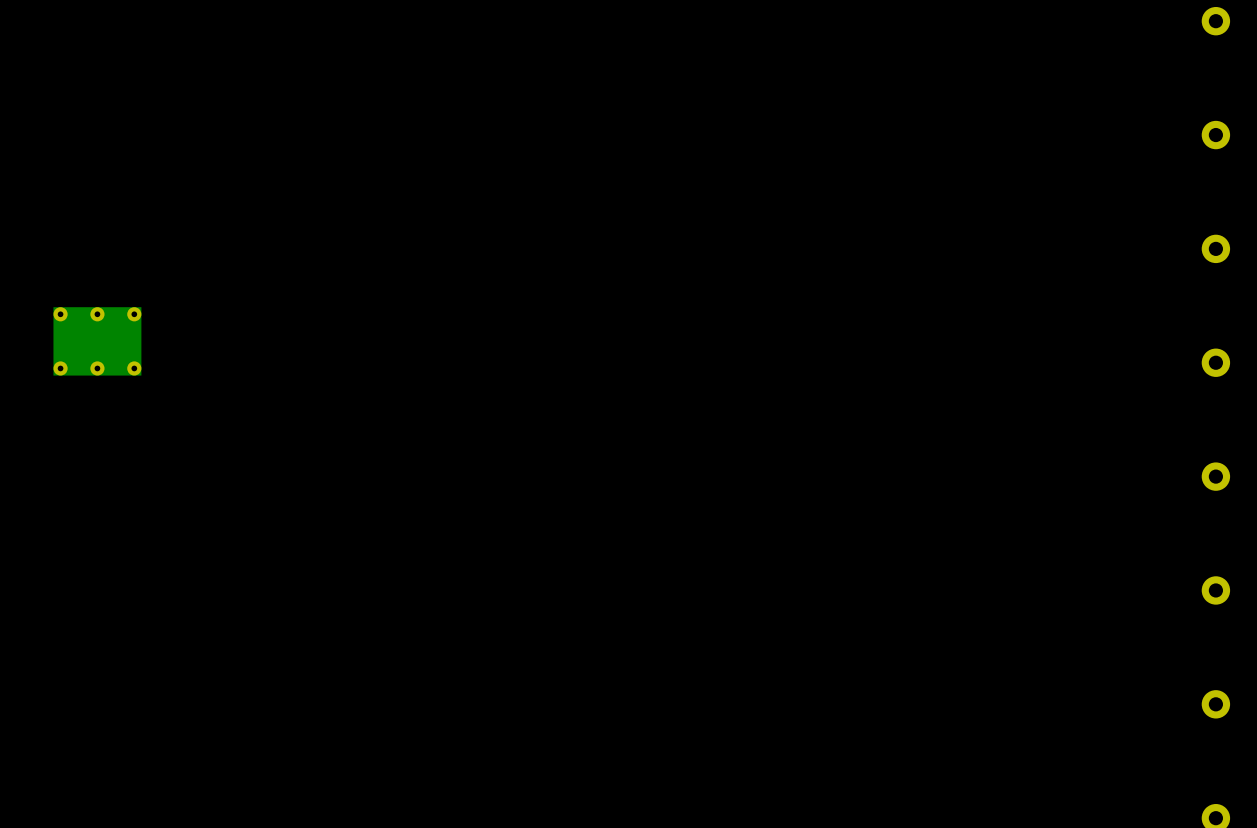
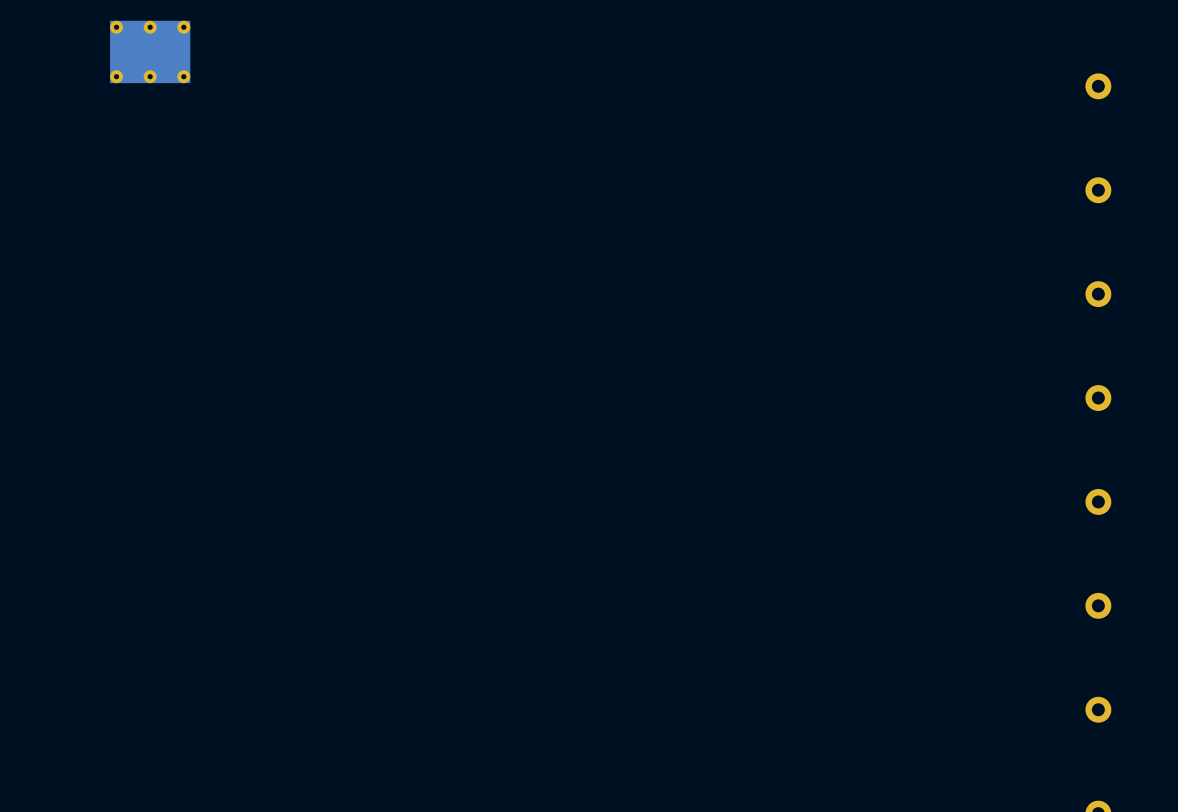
part position: (97, 341) -> (150, 51)

